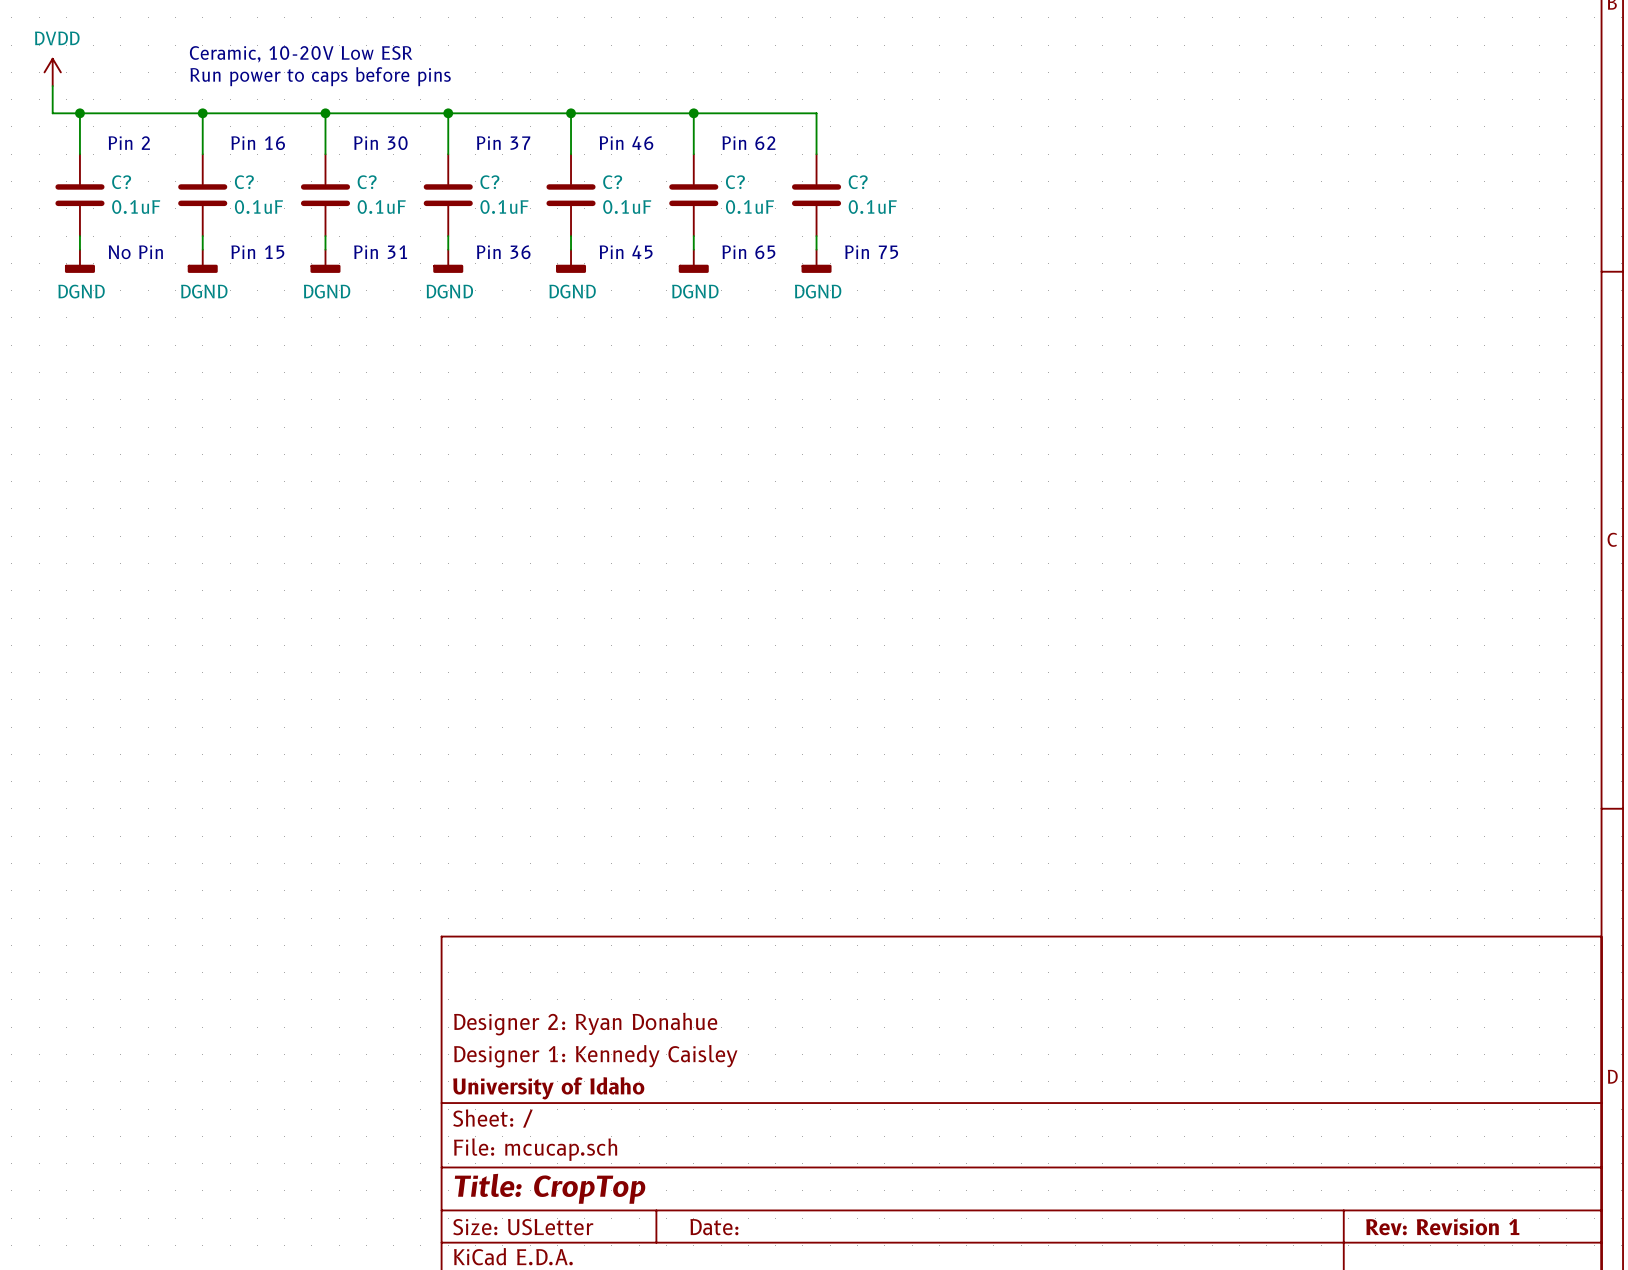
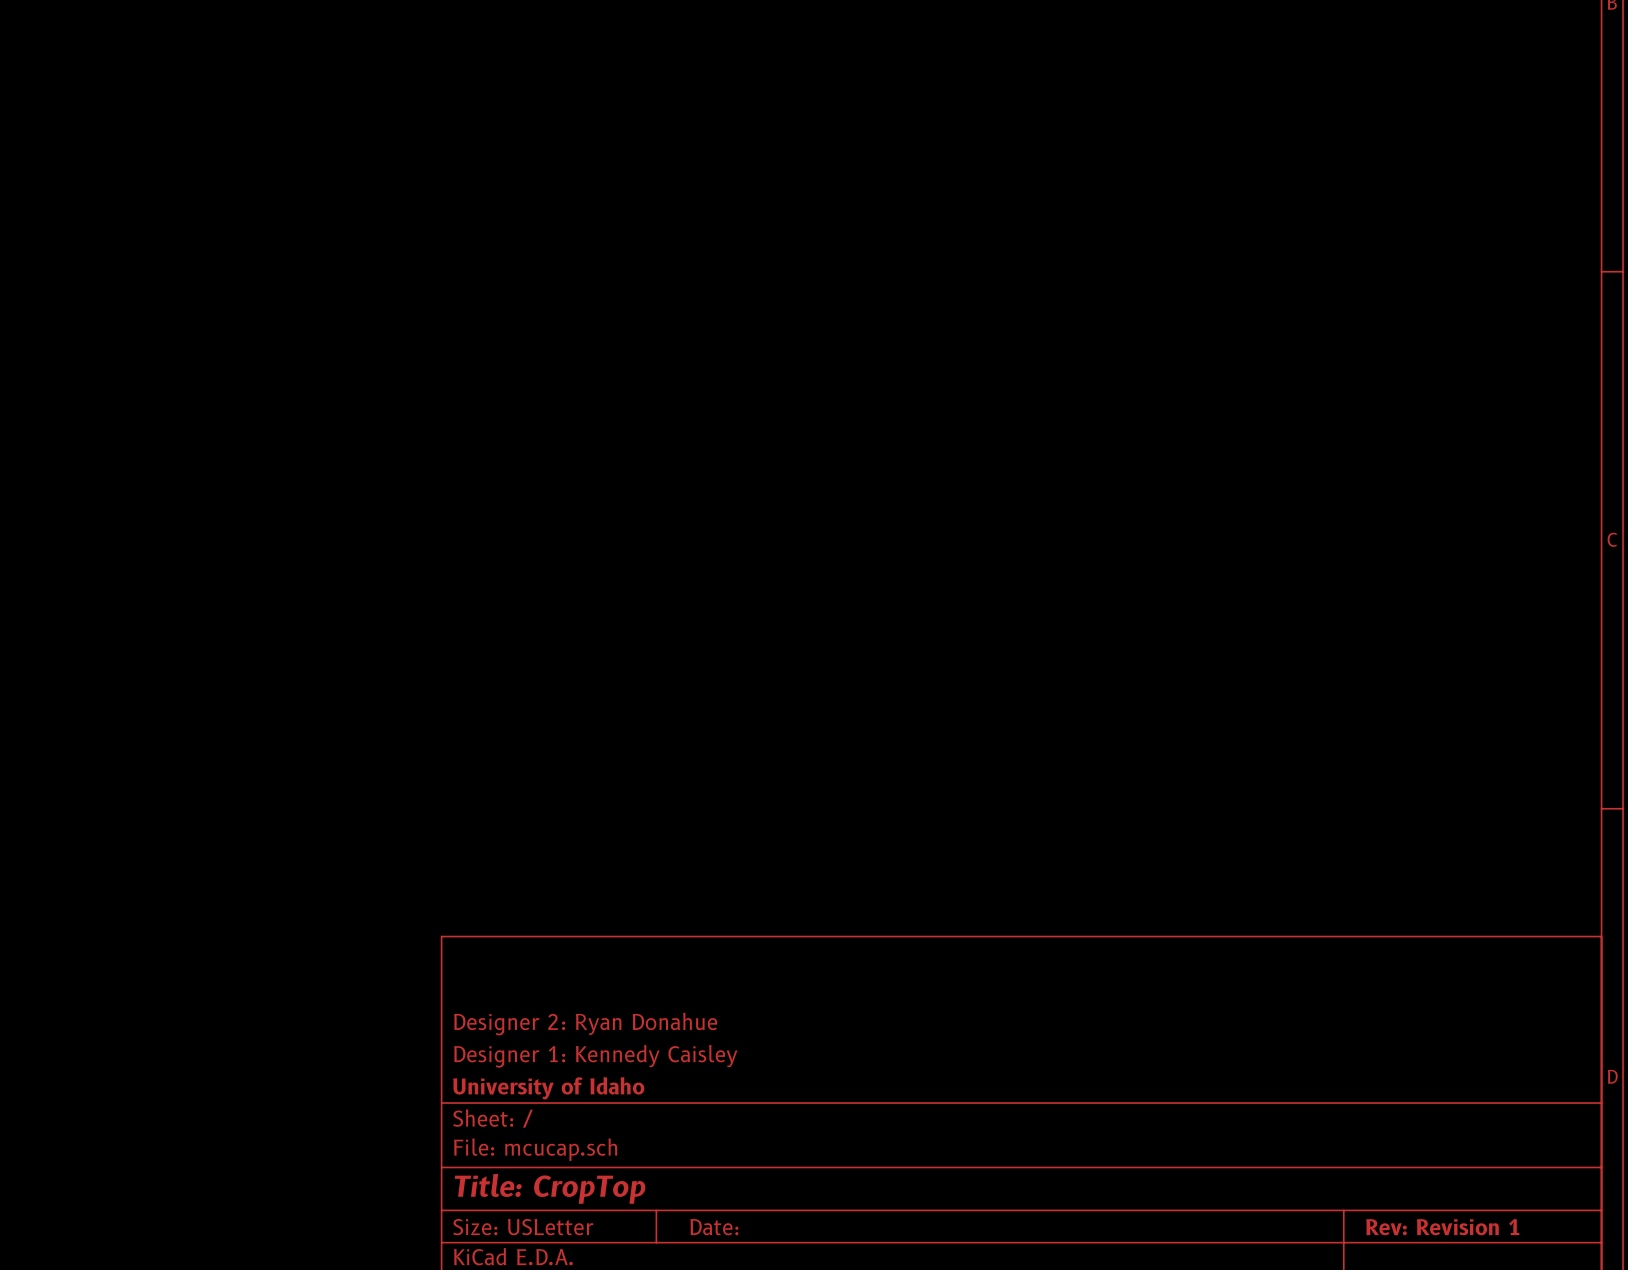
text: Ceramic, 10-20V Low ESR (301, 54) -> none
power symbol: DVDD (52, 72) -> none
text: Run power to caps before pins (320, 76) -> none
wire: (52, 86) (52, 113) (816, 113) (816, 154) -> none
wire: (79, 113) (79, 154) -> none
junction: (79, 113) -> none
wire: (202, 113) (202, 154) -> none
junction: (202, 113) -> none
wire: (325, 113) (325, 154) -> none
junction: (325, 113) -> none
wire: (448, 113) (448, 154) -> none
junction: (448, 113) -> none
wire: (571, 113) (571, 154) -> none
junction: (571, 113) -> none
wire: (693, 113) (693, 154) -> none
junction: (693, 113) -> none
text: Pin 2 (129, 143) -> none
text: Pin 16 (258, 143) -> none
text: Pin 30 (380, 143) -> none
text: Pin 37 (503, 143) -> none
text: Pin 46 (626, 143) -> none
text: Pin 62 (748, 143) -> none
C?: 0.1uF (79, 195) -> none
C?: 0.1uF (202, 195) -> none
C?: 0.1uF (325, 195) -> none
C?: 0.1uF (448, 195) -> none
C?: 0.1uF (571, 195) -> none
C?: 0.1uF (693, 195) -> none
C?: 0.1uF (816, 195) -> none
wire: (79, 236) (79, 249) -> none
wire: (202, 236) (202, 249) -> none
wire: (325, 236) (325, 249) -> none
wire: (448, 236) (448, 249) -> none
wire: (571, 236) (571, 249) -> none
wire: (693, 236) (693, 249) -> none
wire: (816, 236) (816, 249) -> none
text: No Pin (135, 252) -> none
text: Pin 15 (257, 252) -> none
text: Pin 31 (380, 252) -> none
text: Pin 36 (503, 252) -> none
text: Pin 45 (626, 252) -> none
text: Pin 65 (748, 252) -> none
text: Pin 75 (871, 252) -> none
power symbol: DGND (79, 261) -> none
power symbol: DGND (202, 261) -> none
power symbol: DGND (325, 261) -> none
power symbol: DGND (448, 261) -> none
power symbol: DGND (571, 261) -> none
power symbol: DGND (693, 261) -> none
power symbol: DGND (816, 261) -> none

